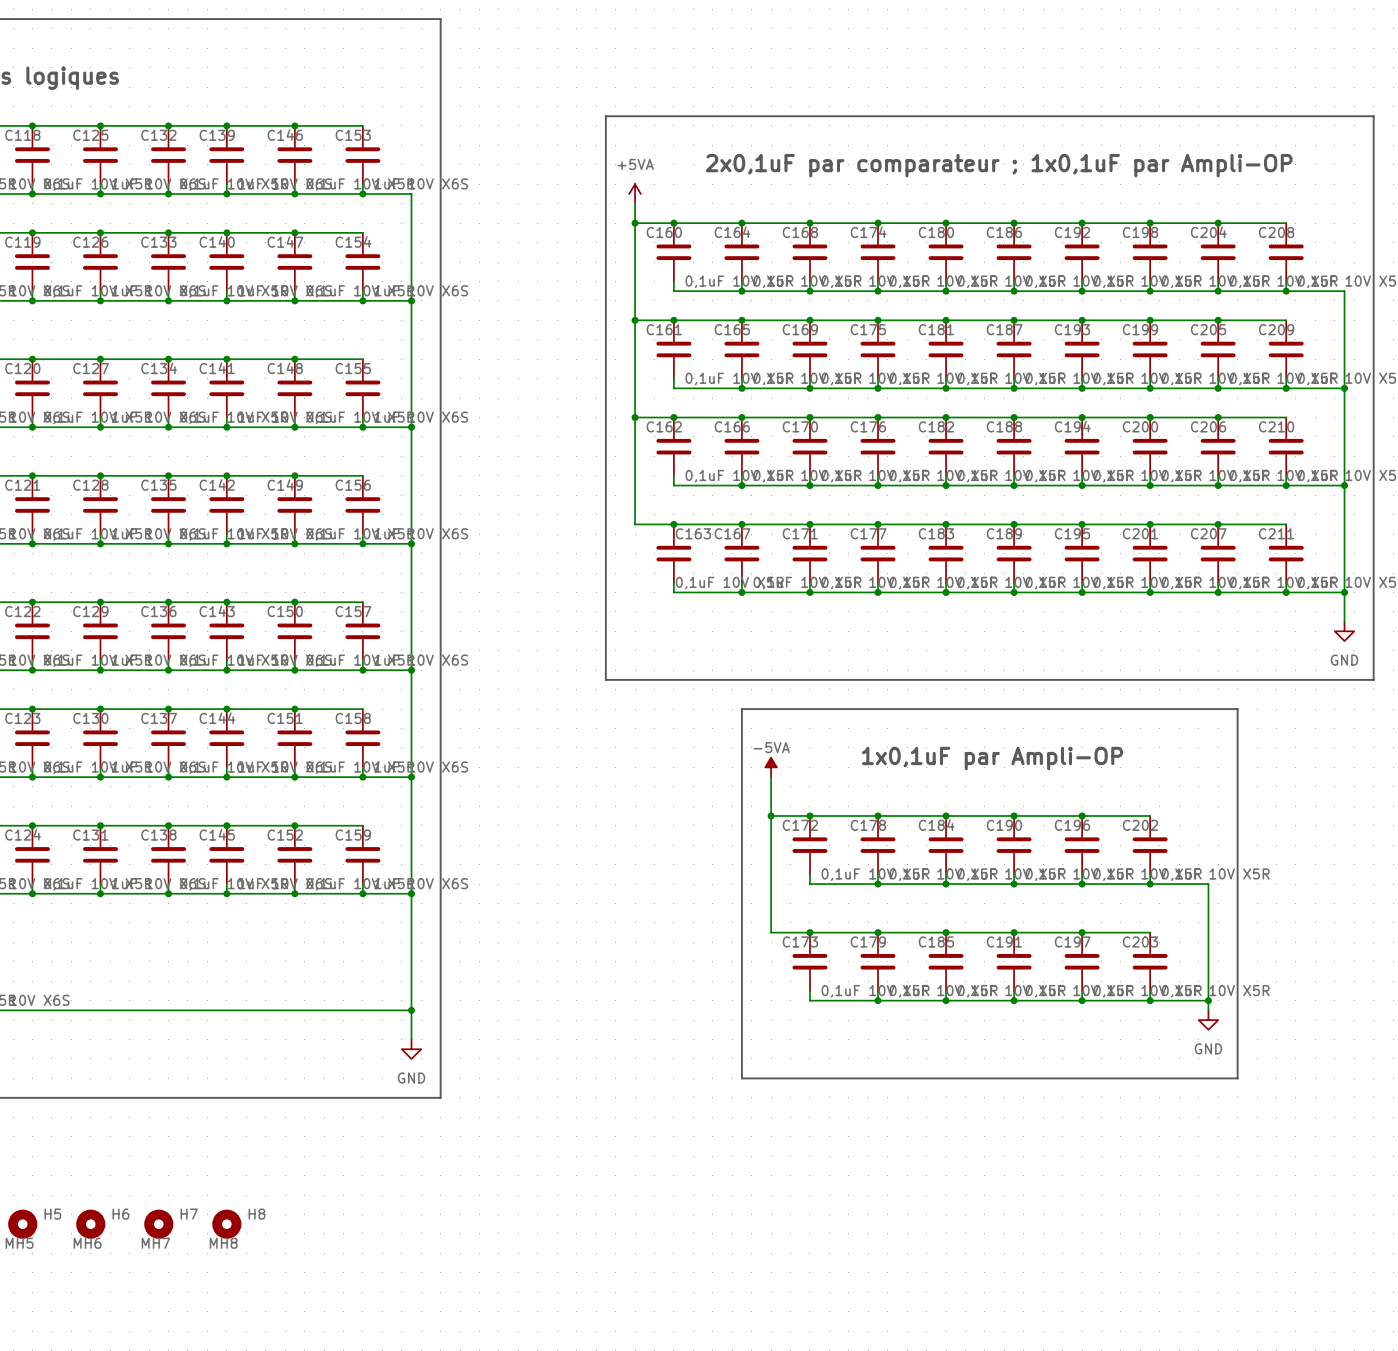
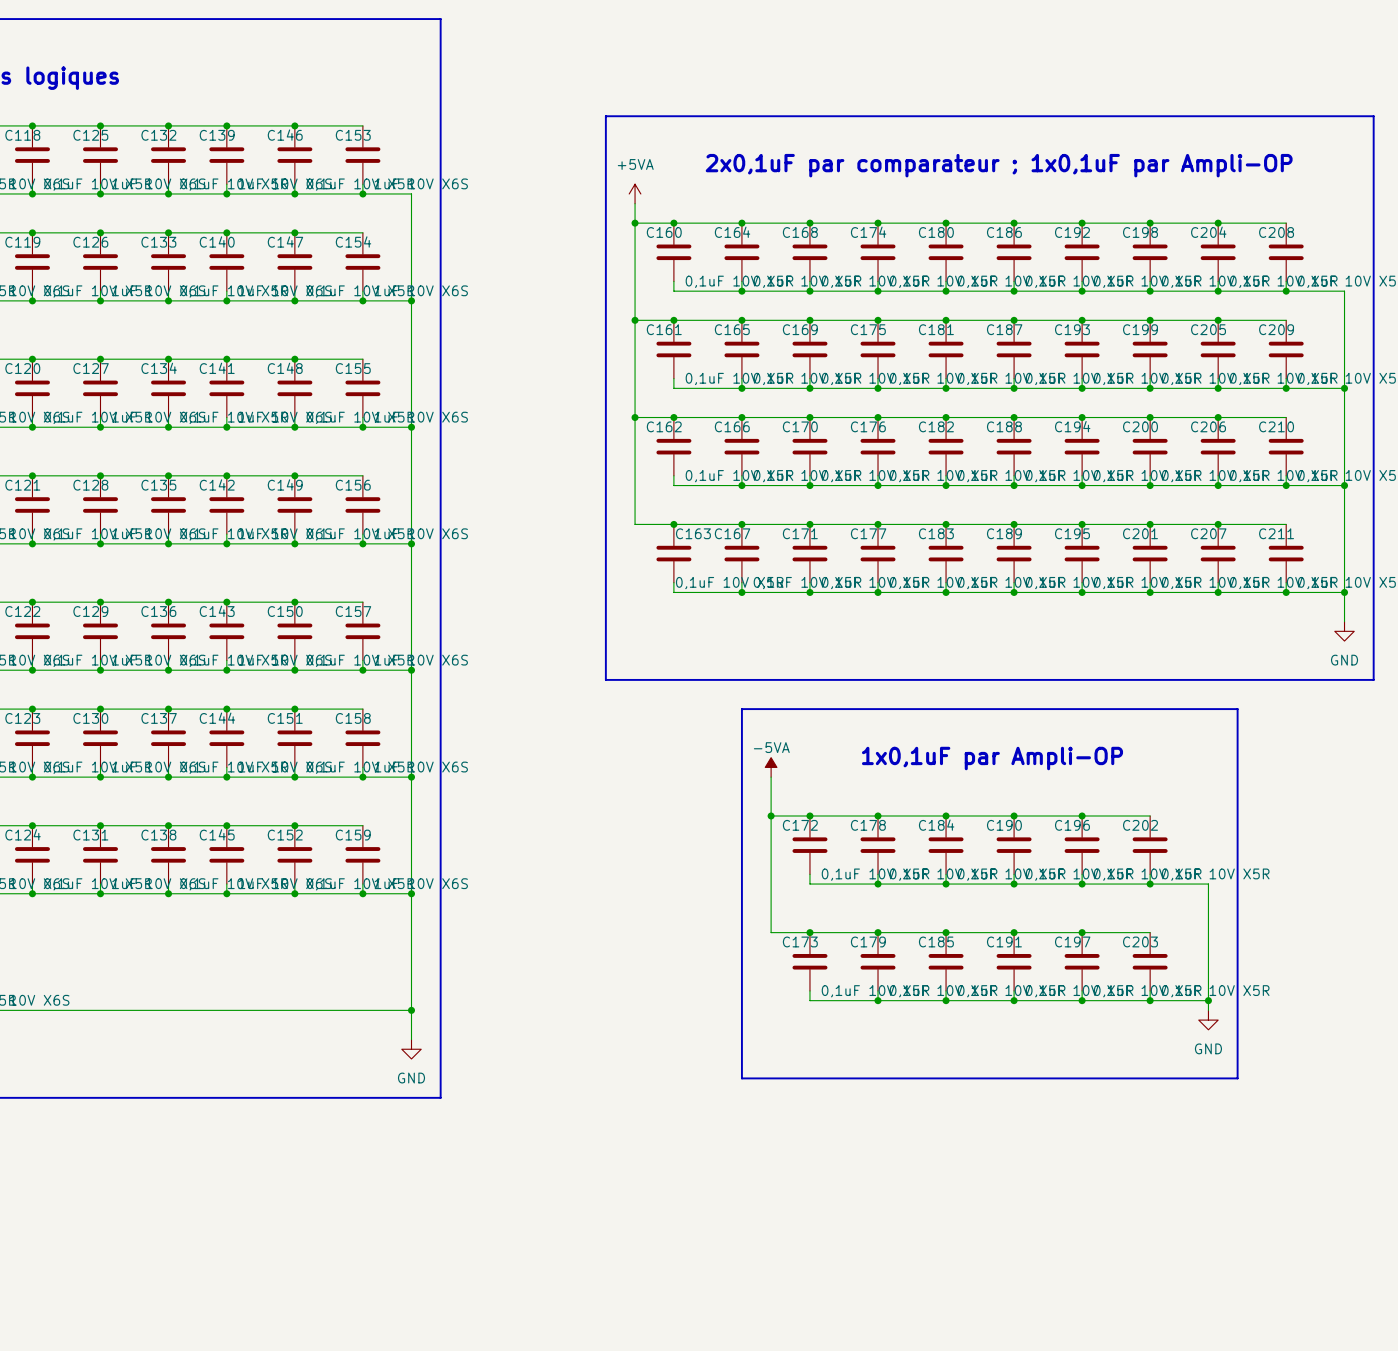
H5: MH5 (22, 1224) -> none
H6: MH6 (90, 1224) -> none
H7: MH7 (158, 1224) -> none
H8: MH8 (226, 1224) -> none

